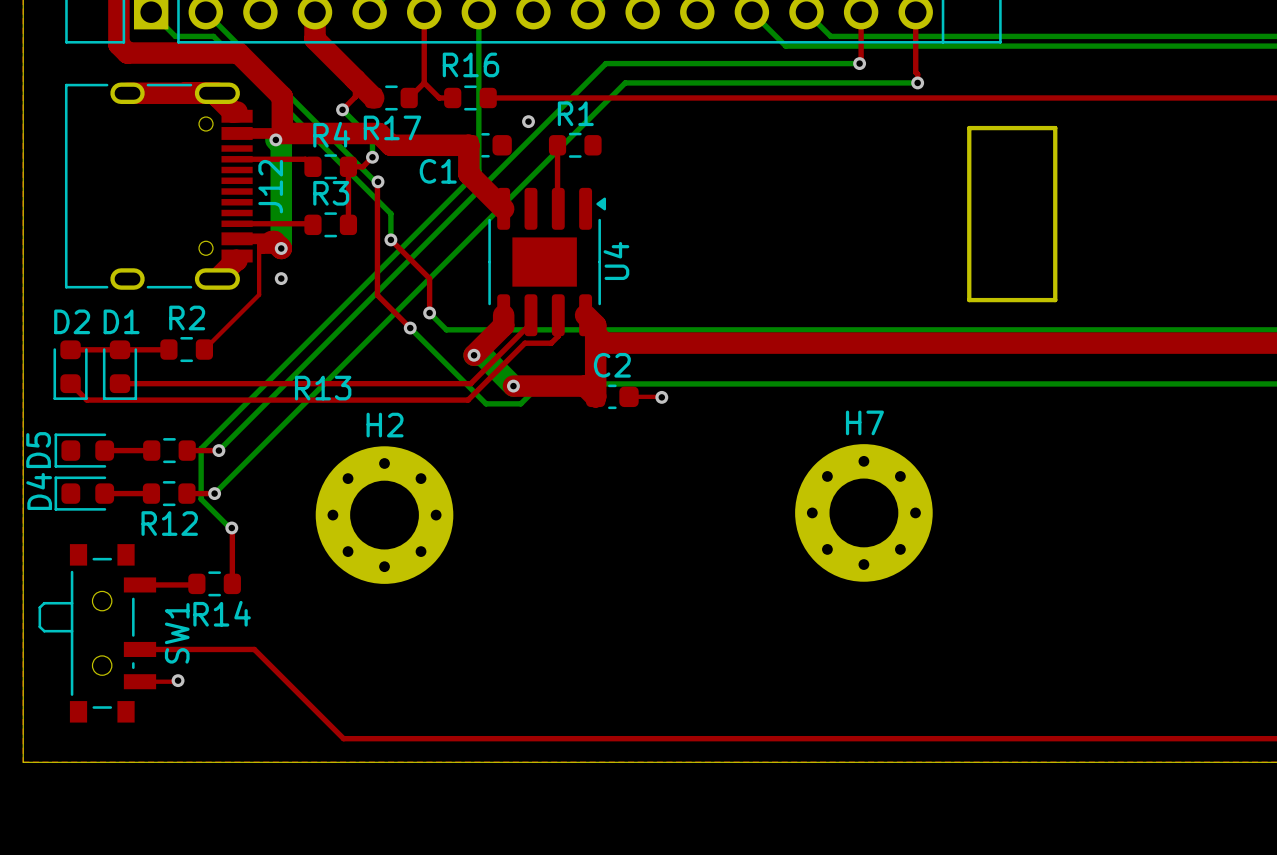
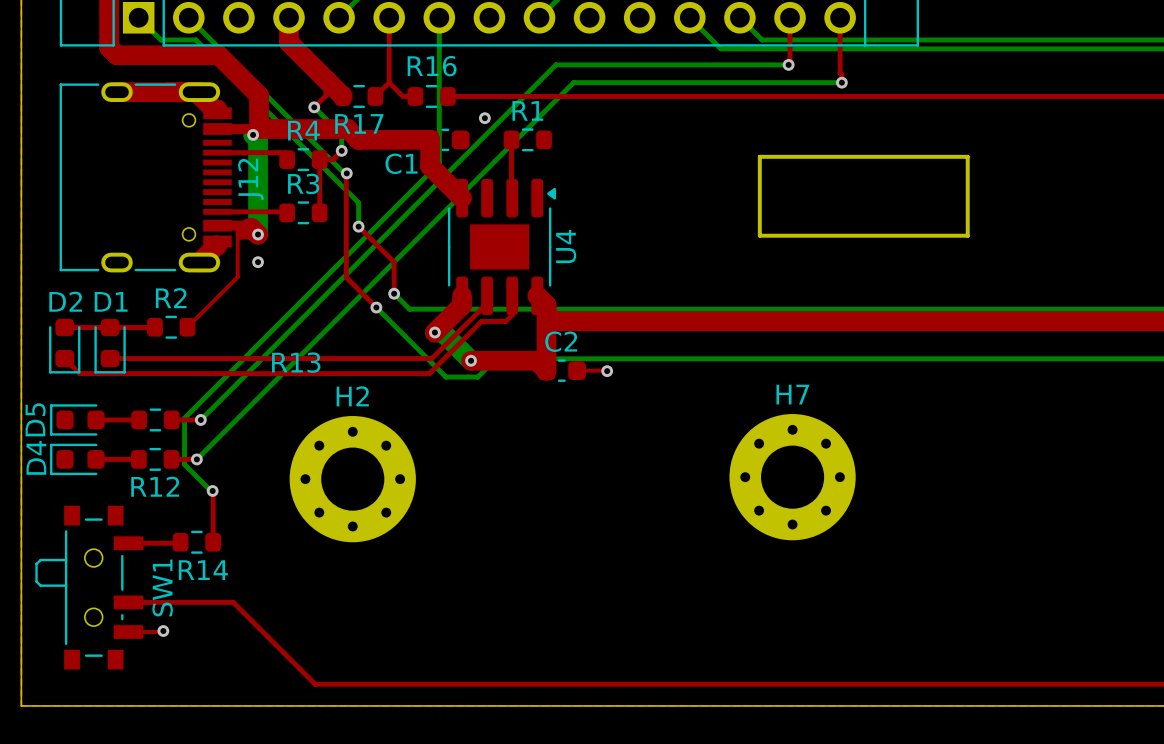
board edge: (969, 128) (1055, 128) (1055, 300) (969, 300) (969, 128) -> none
board edge: none -> (759, 156) (967, 156) (967, 235) (759, 235) (759, 156)

